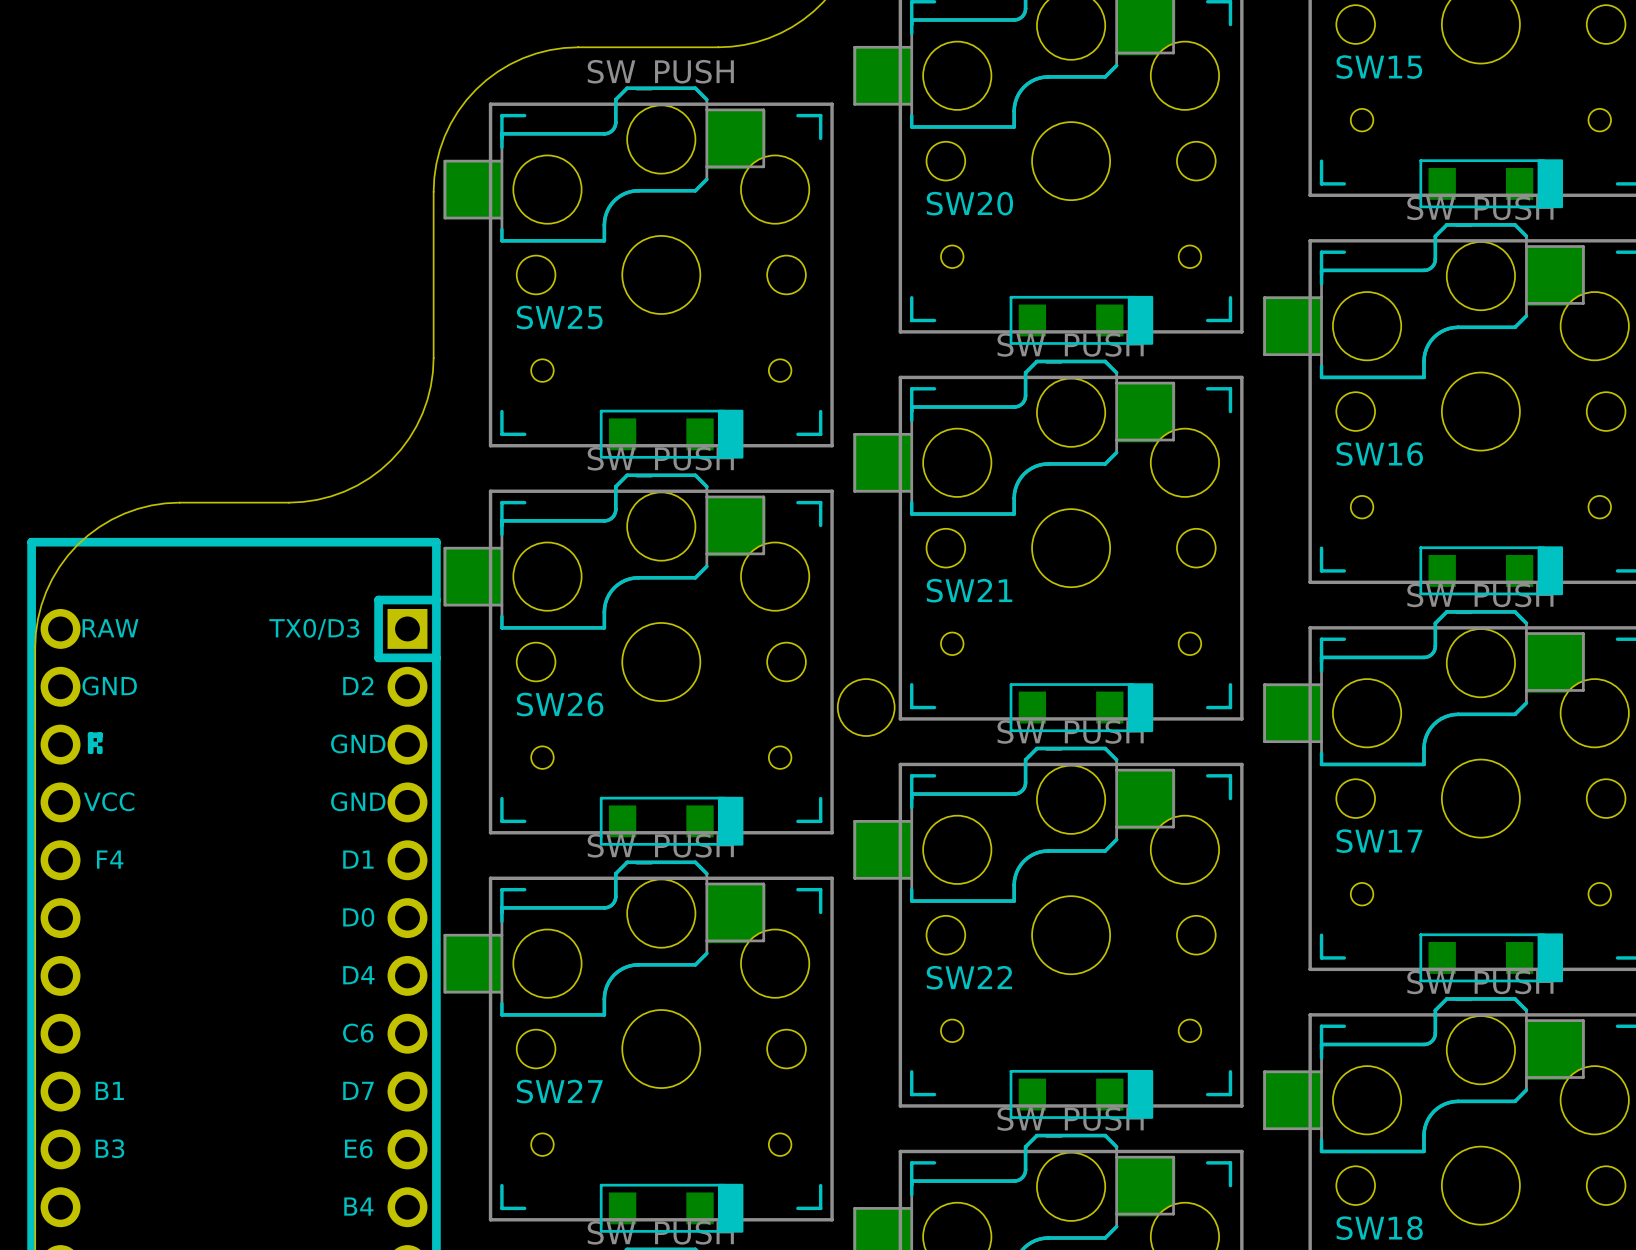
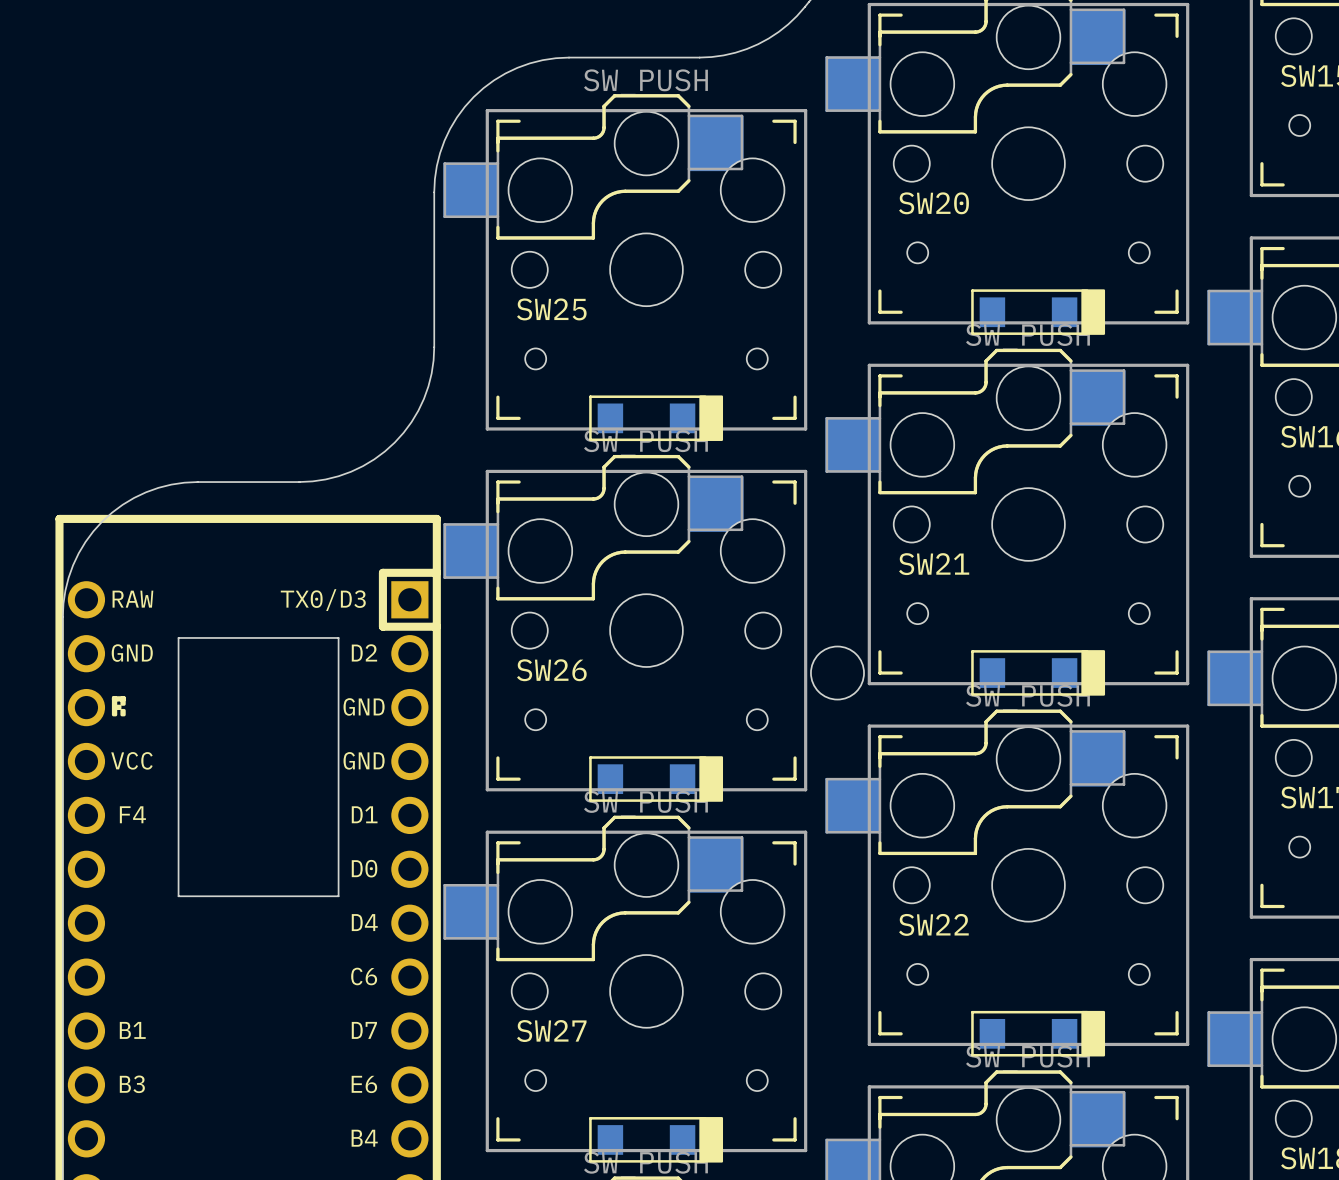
board edge: none -> (338, 637) (338, 896) (178, 896) (178, 637) (338, 637)
part side: top (1081, 707) -> bottom (1038, 672)

